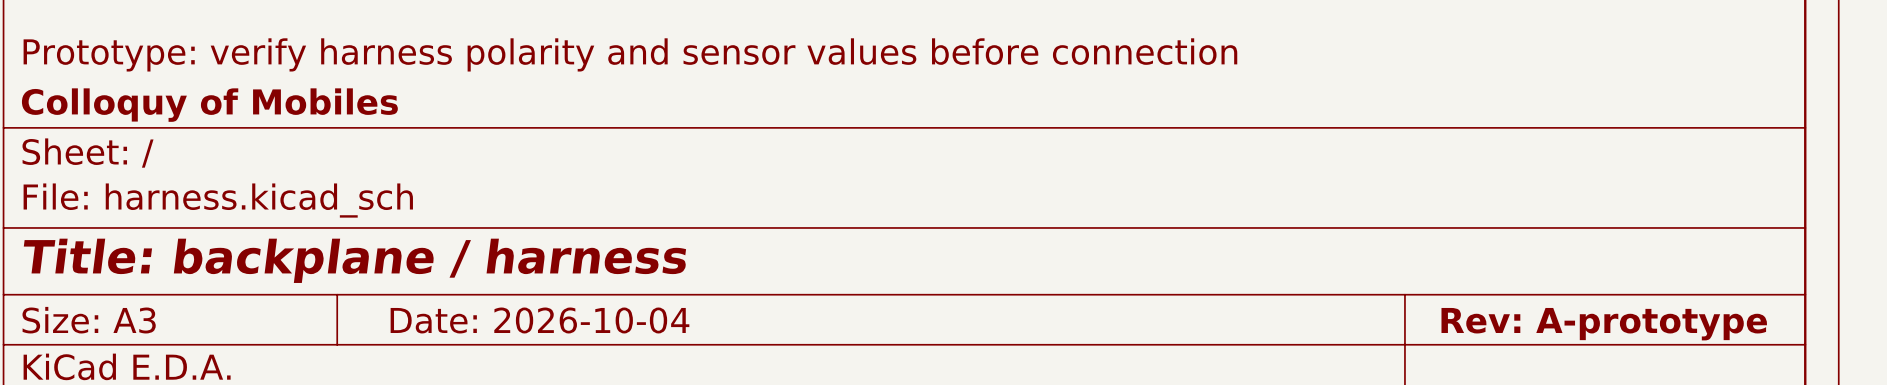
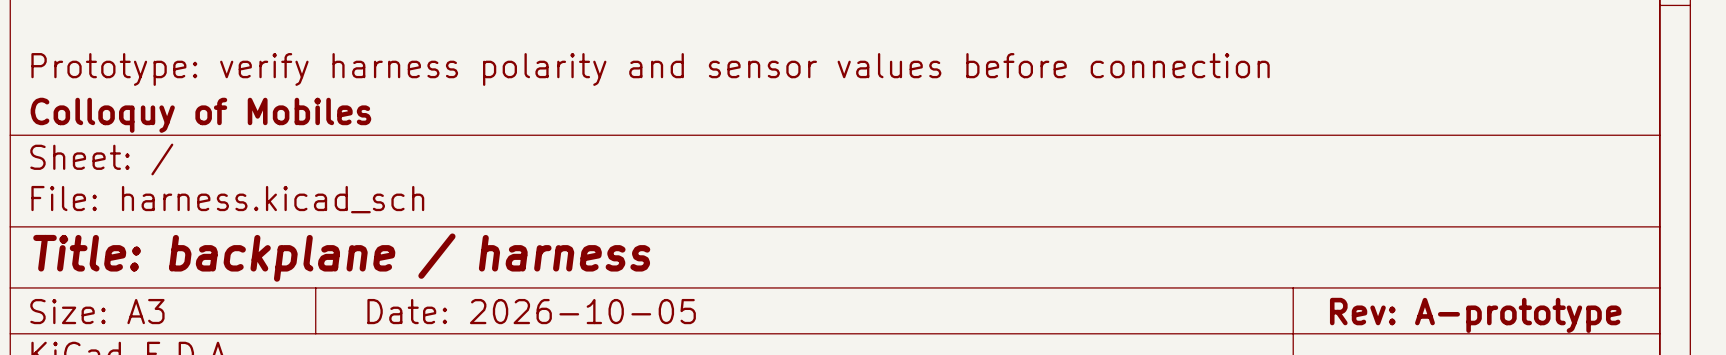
title block: Date: 2026-10-04 (539, 320) -> Date: 2026-10-05 (531, 311)

